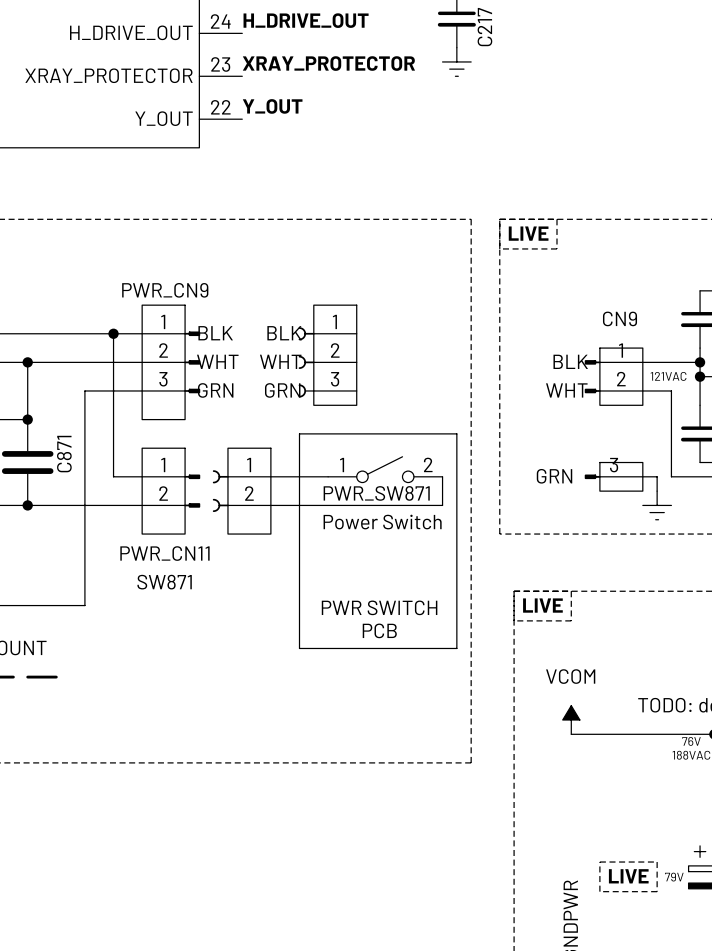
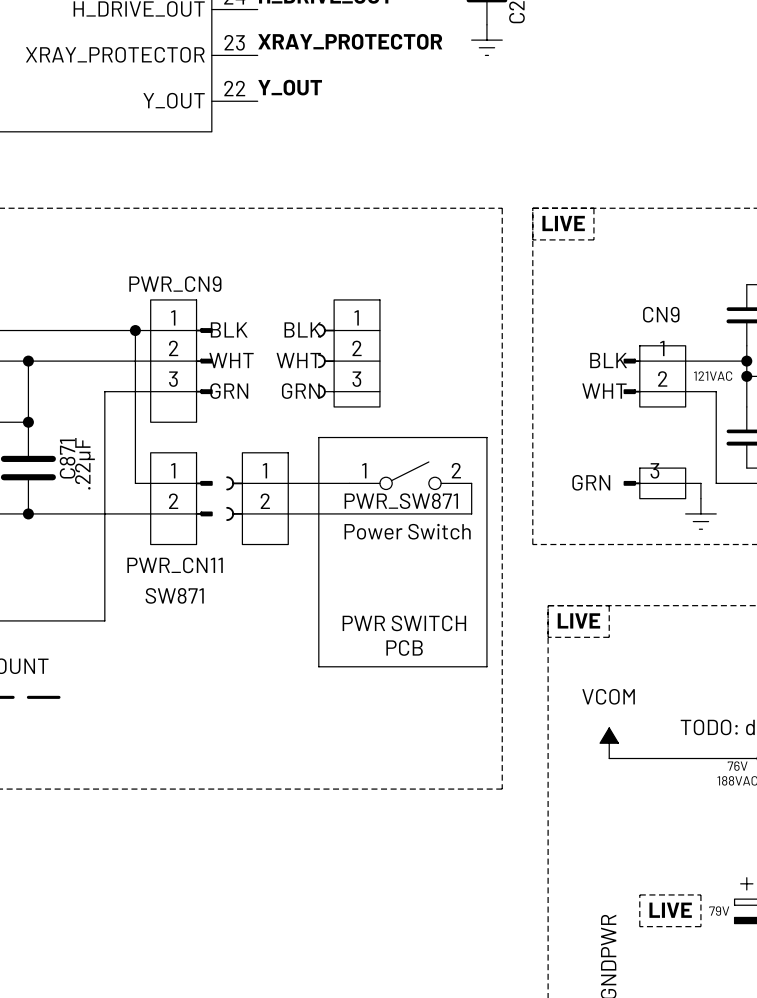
wire: (113, 333) (113, 476) (127, 476) -> (135, 330) (135, 483)
junction position: (113, 333) -> (135, 330)
wire: (99, 390) (84, 390) (84, 605) -> (104, 391) (104, 620) (89, 620)
C871 value: none -> .22µF (84, 463)

